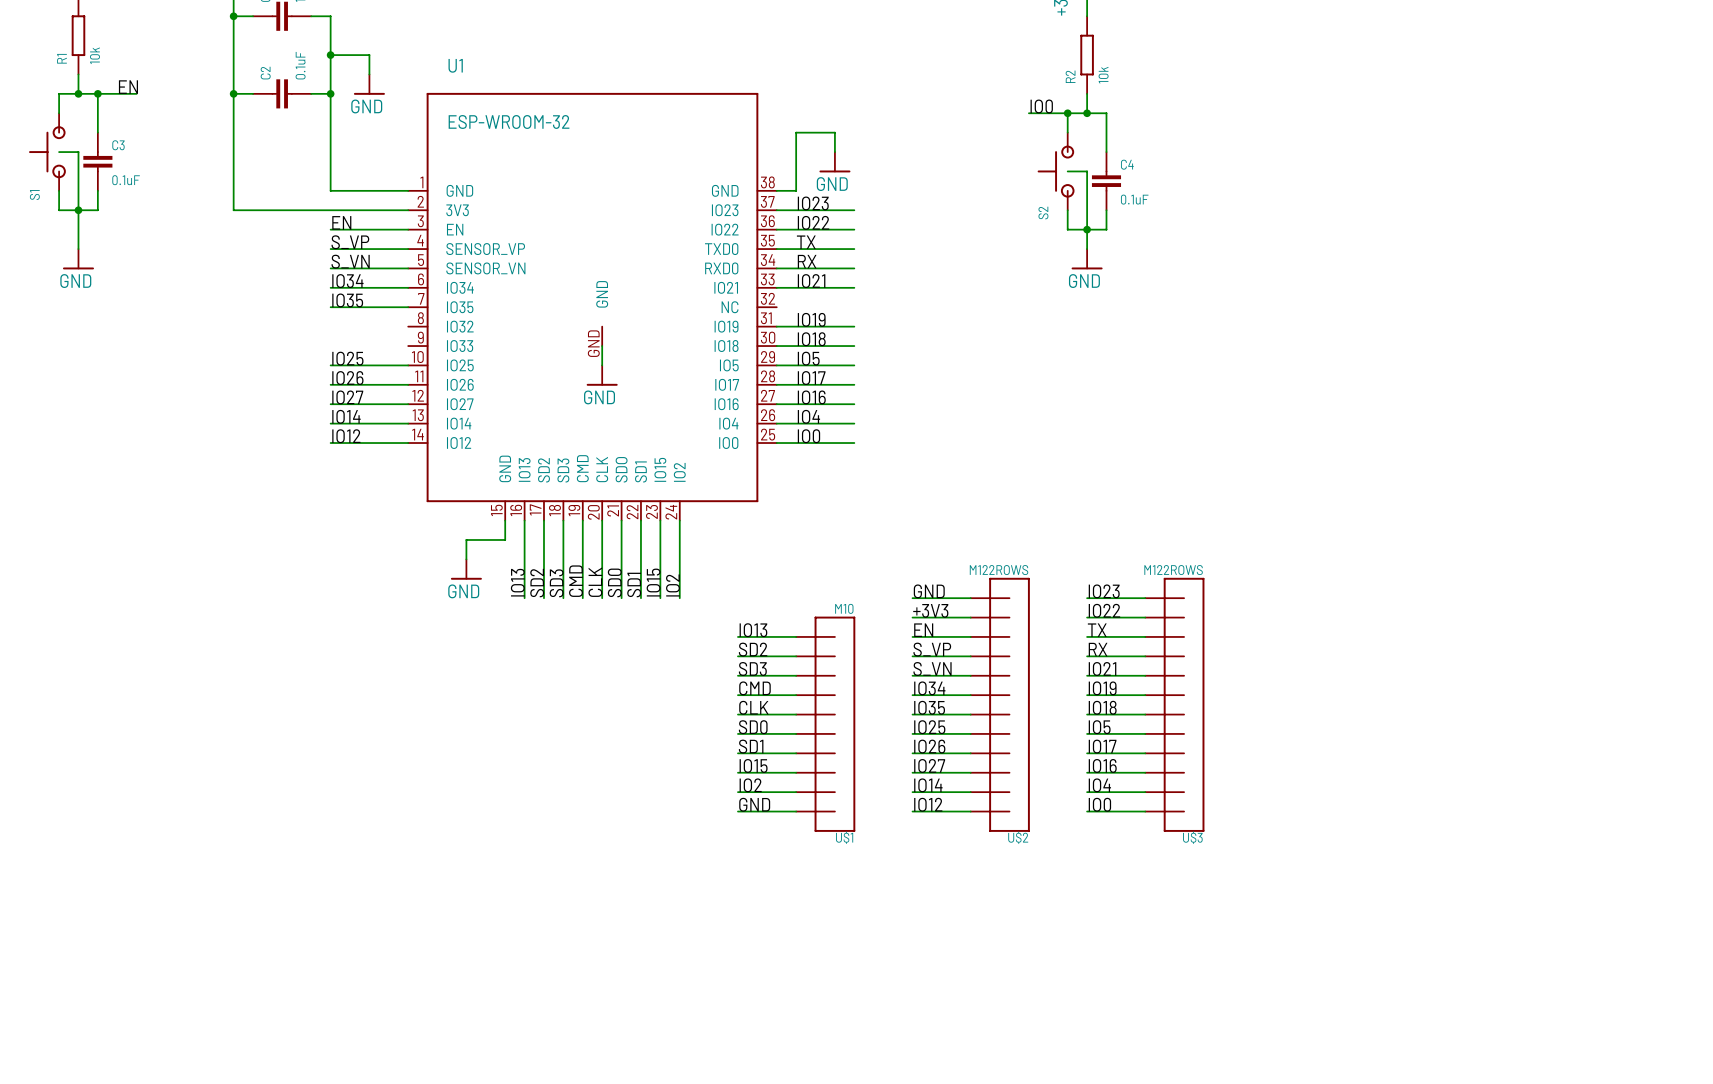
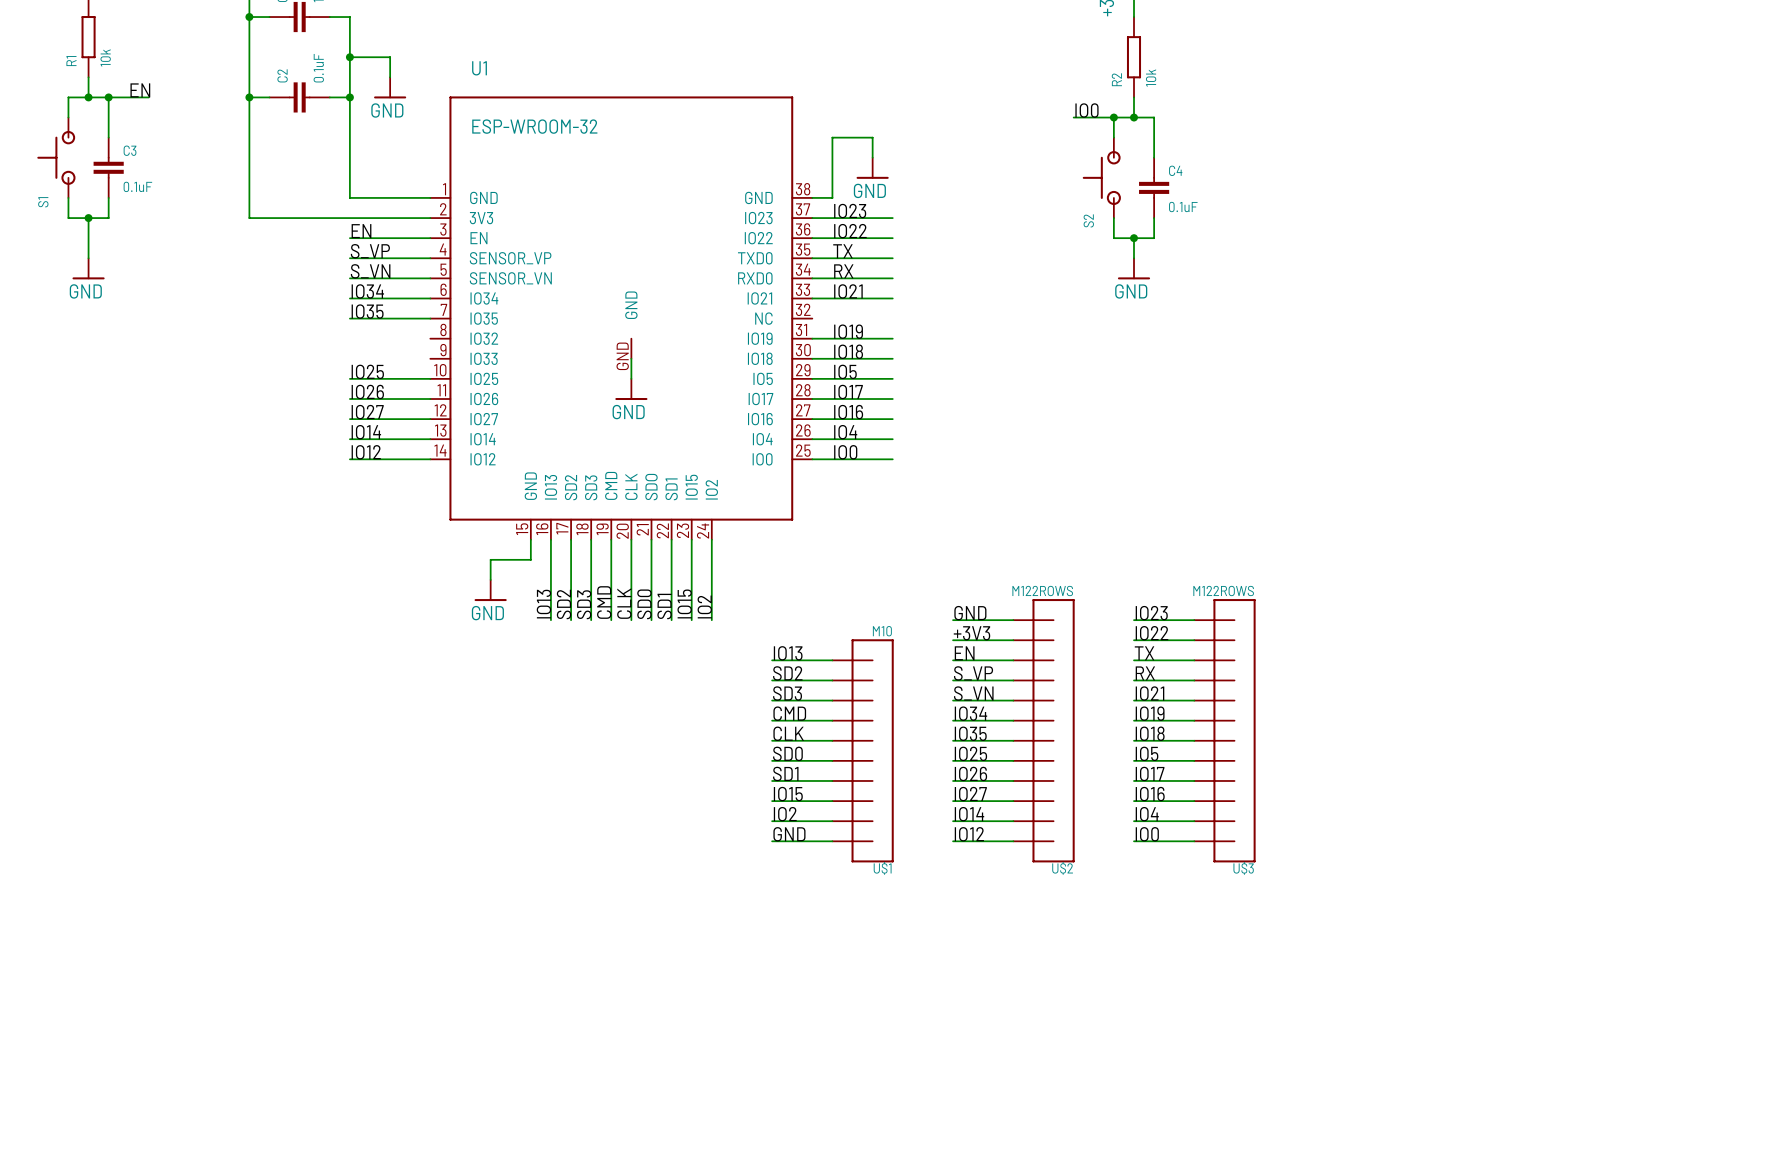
wire: (59, 152) (78, 152) (78, 210) -> none
wire: (1067, 171) (1087, 171) (1087, 229) -> none

